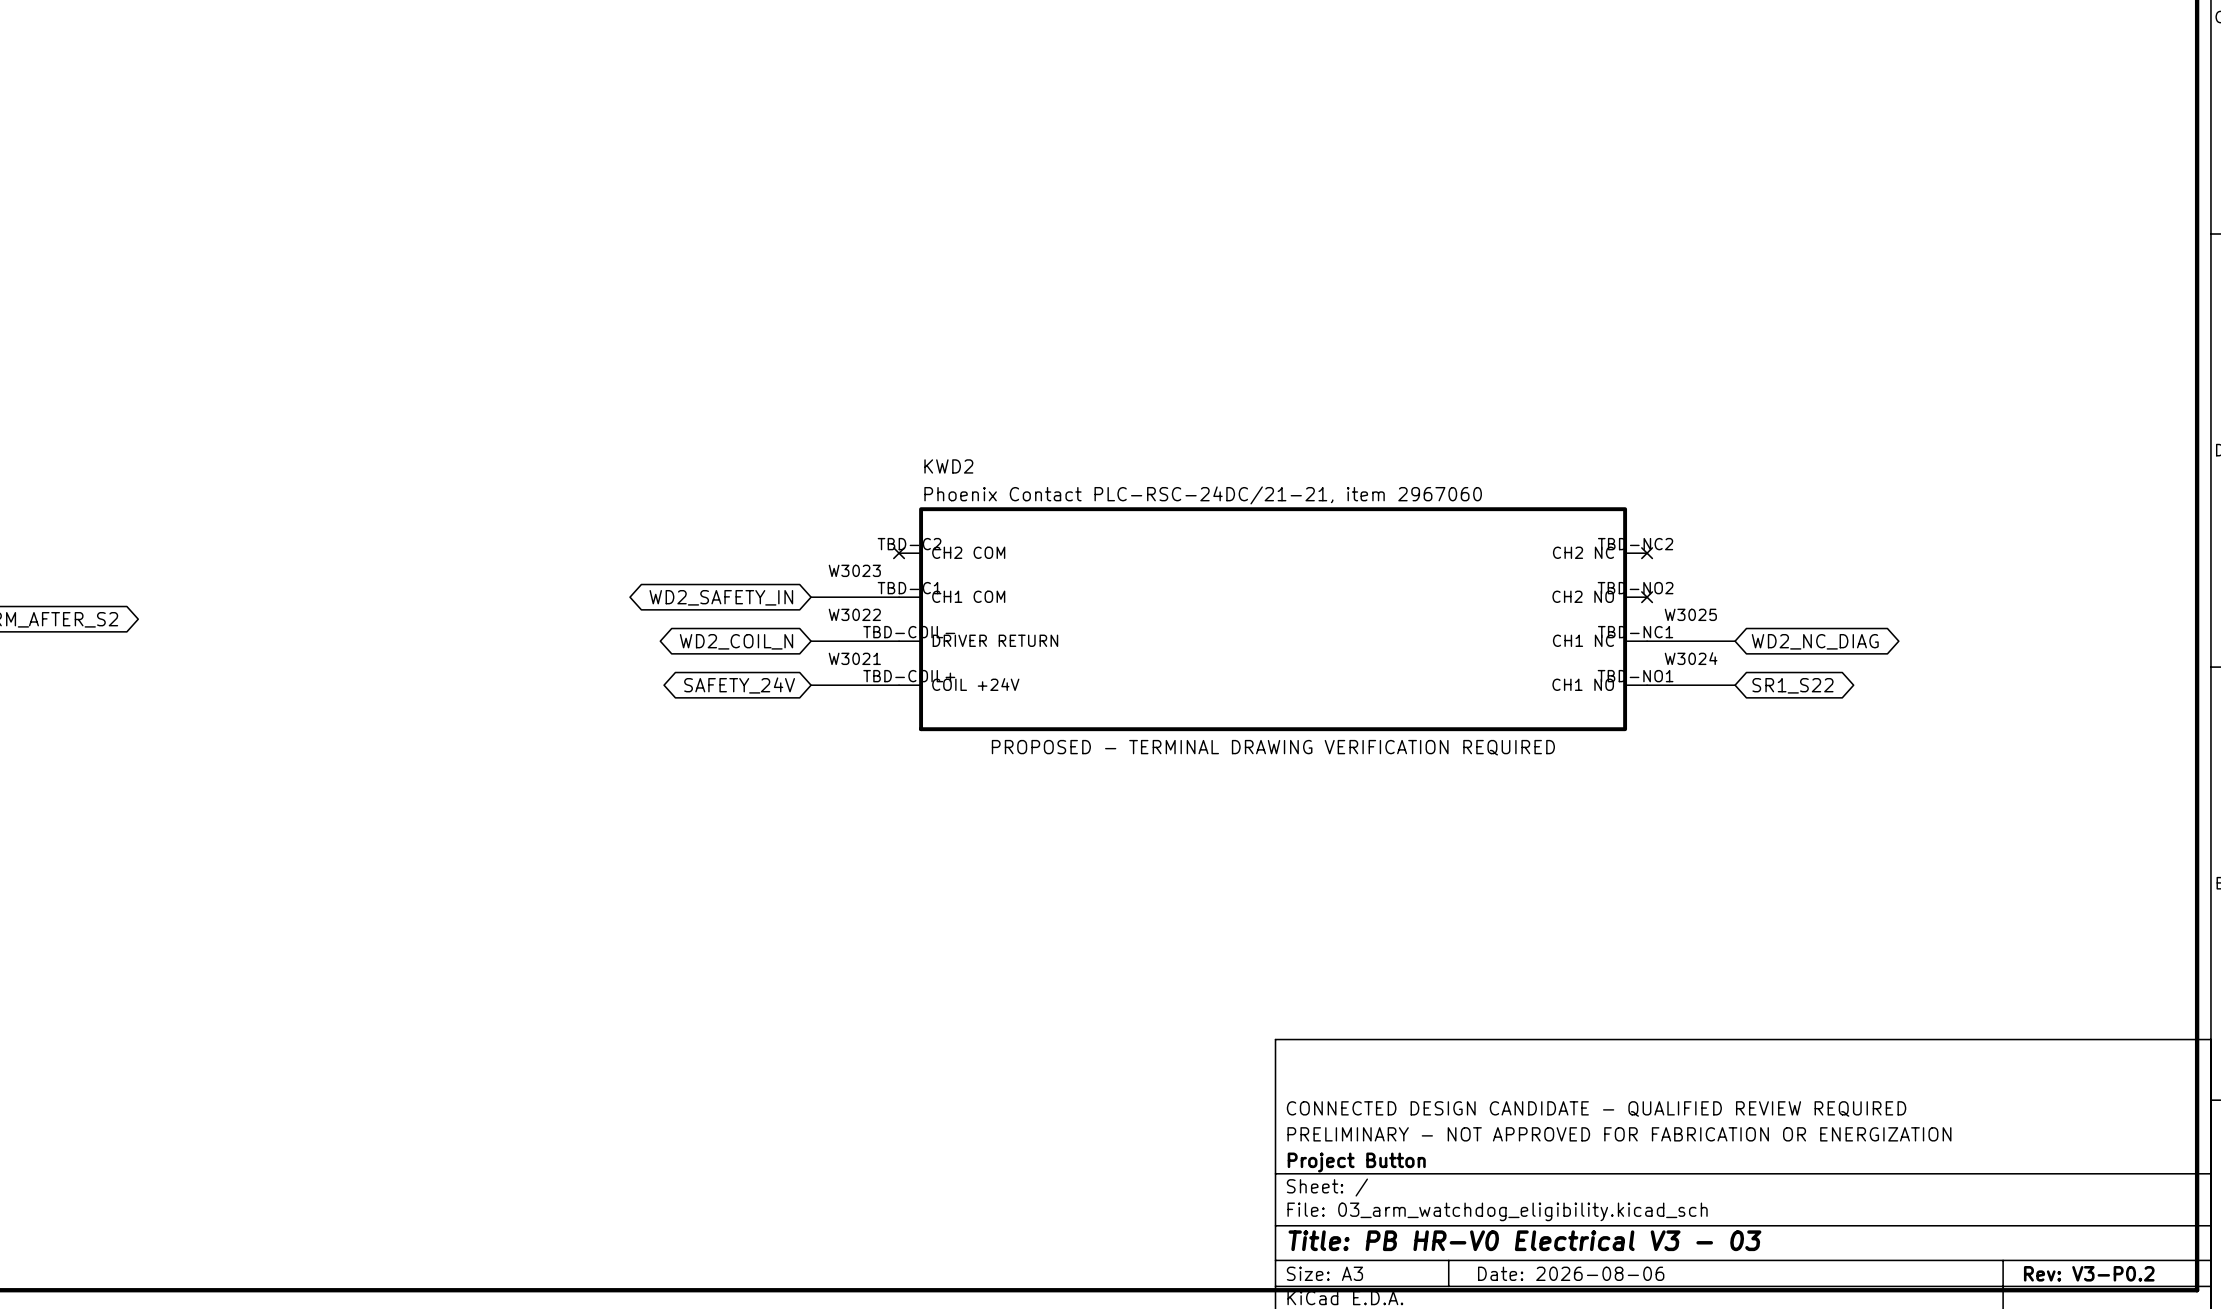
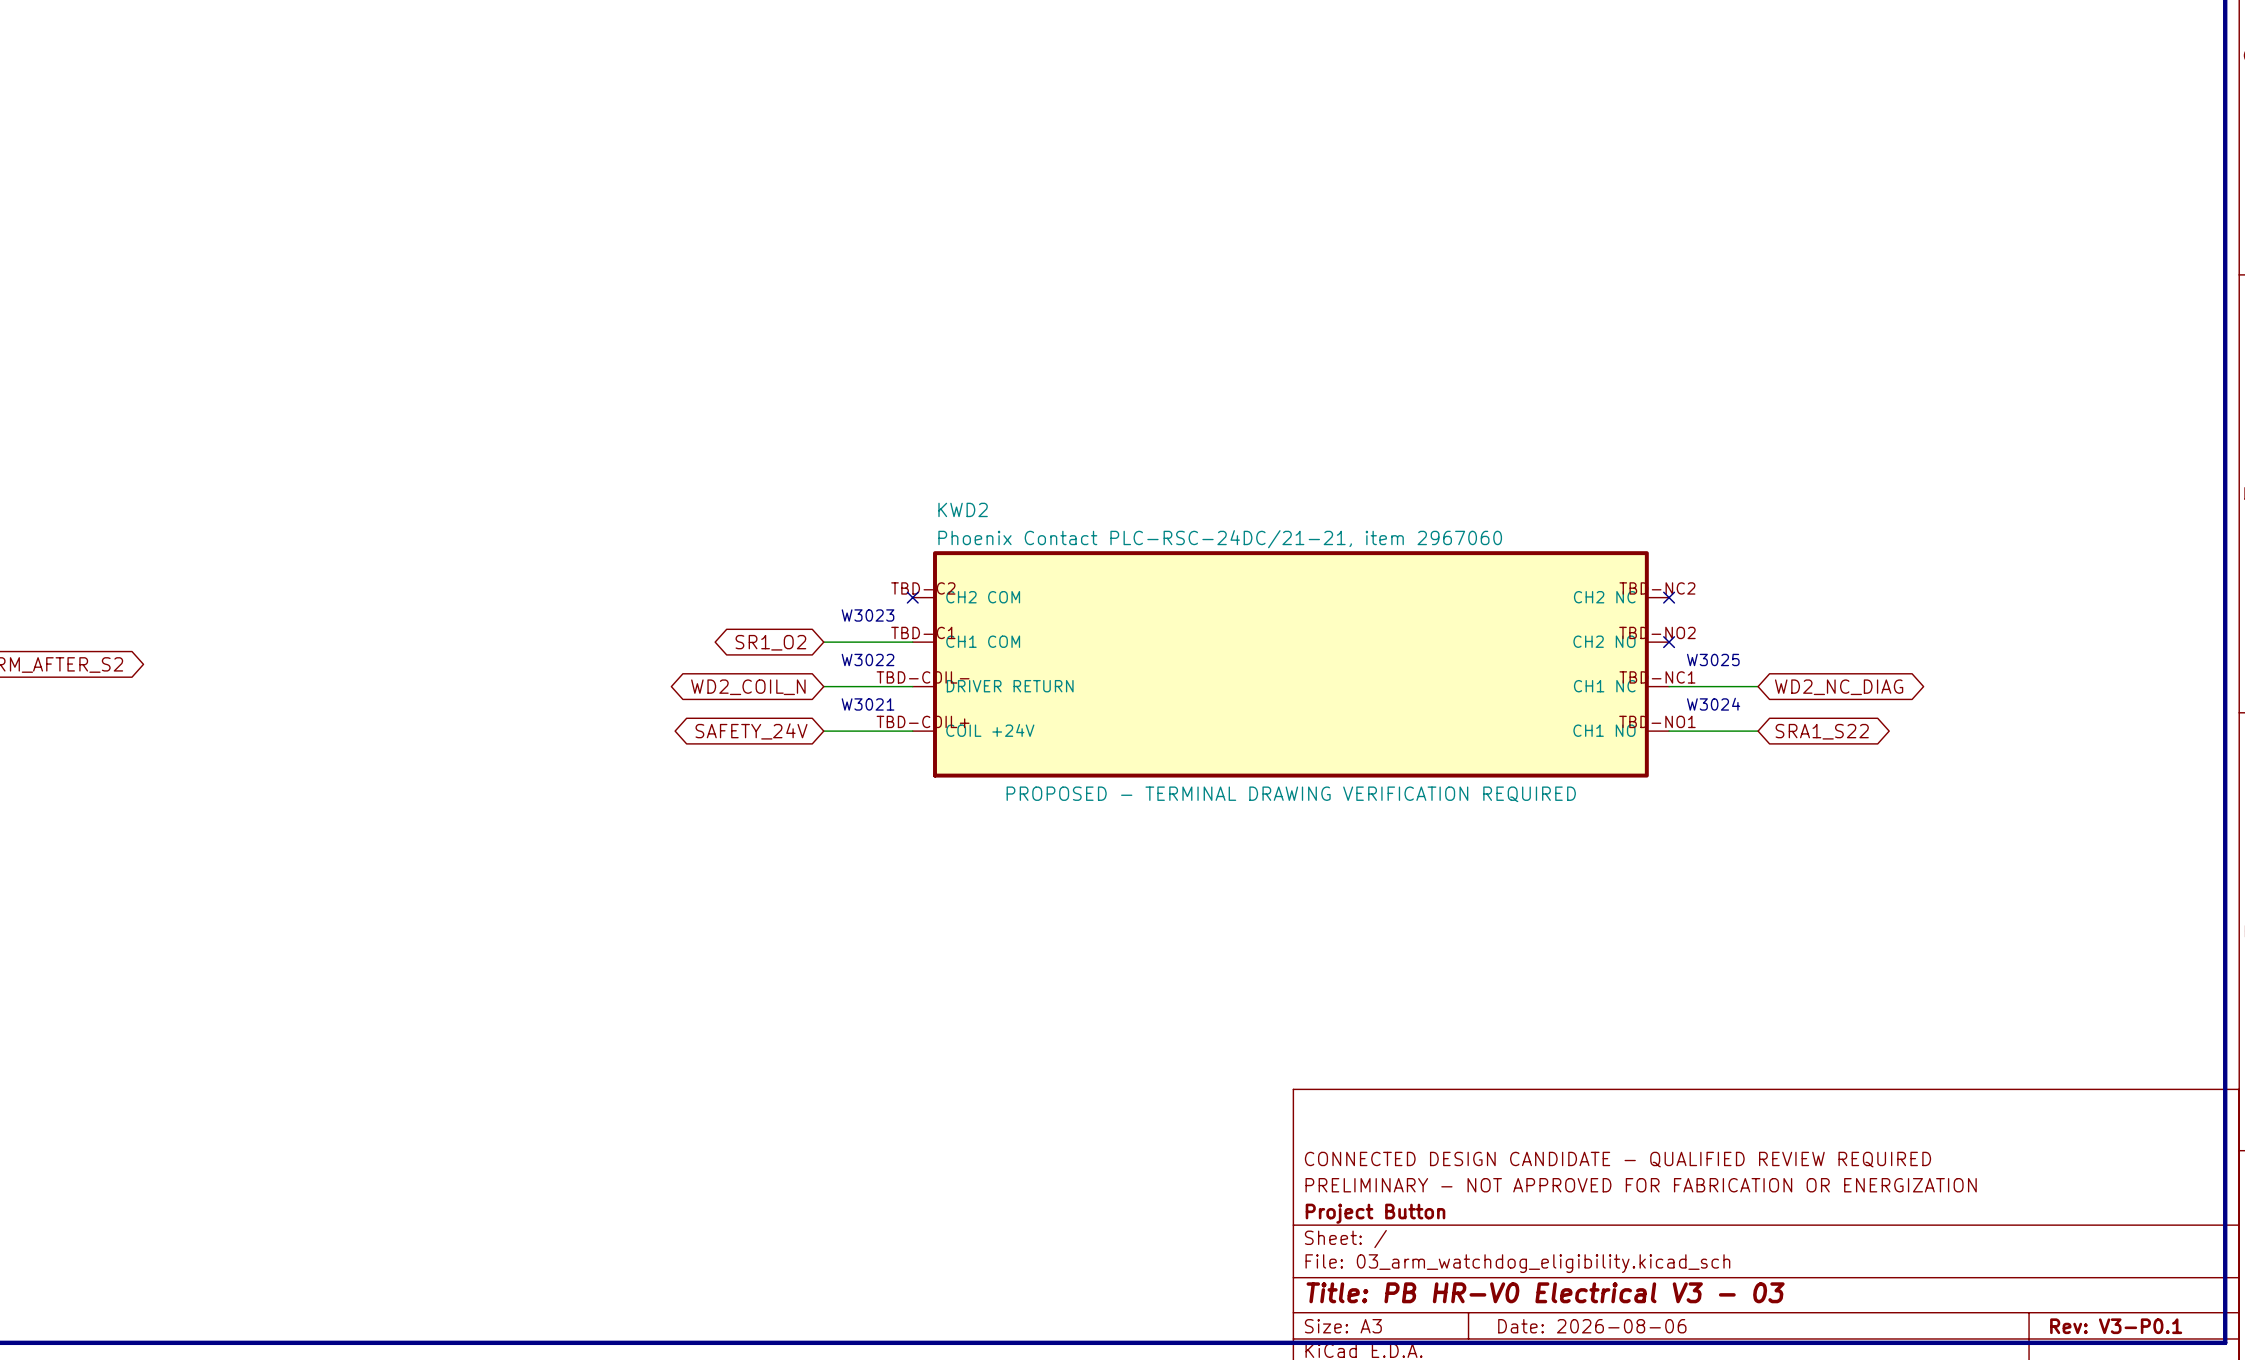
global label: WD2_SAFETY_IN (721, 597) -> SR1_O2 (770, 642)
global label: SR1_S22 (1792, 685) -> SRA1_S22 (1822, 731)
title block: Rev: V3-P0.2 (2089, 1273) -> Rev: V3-P0.1 (2116, 1326)

